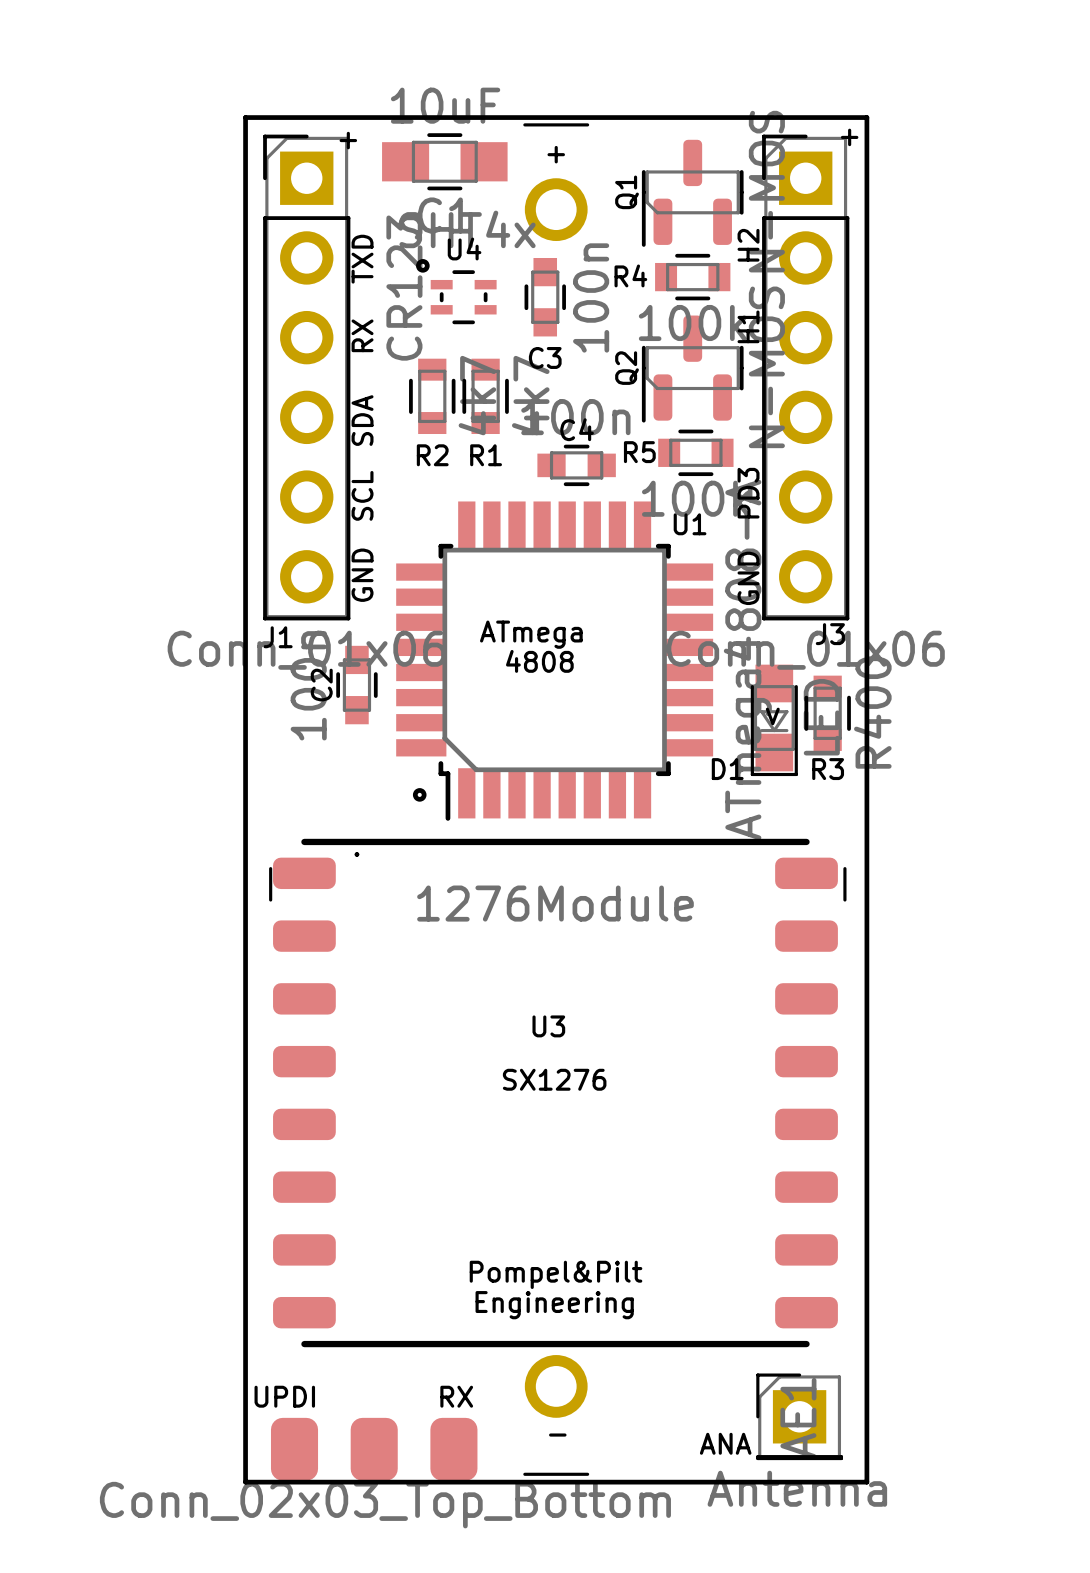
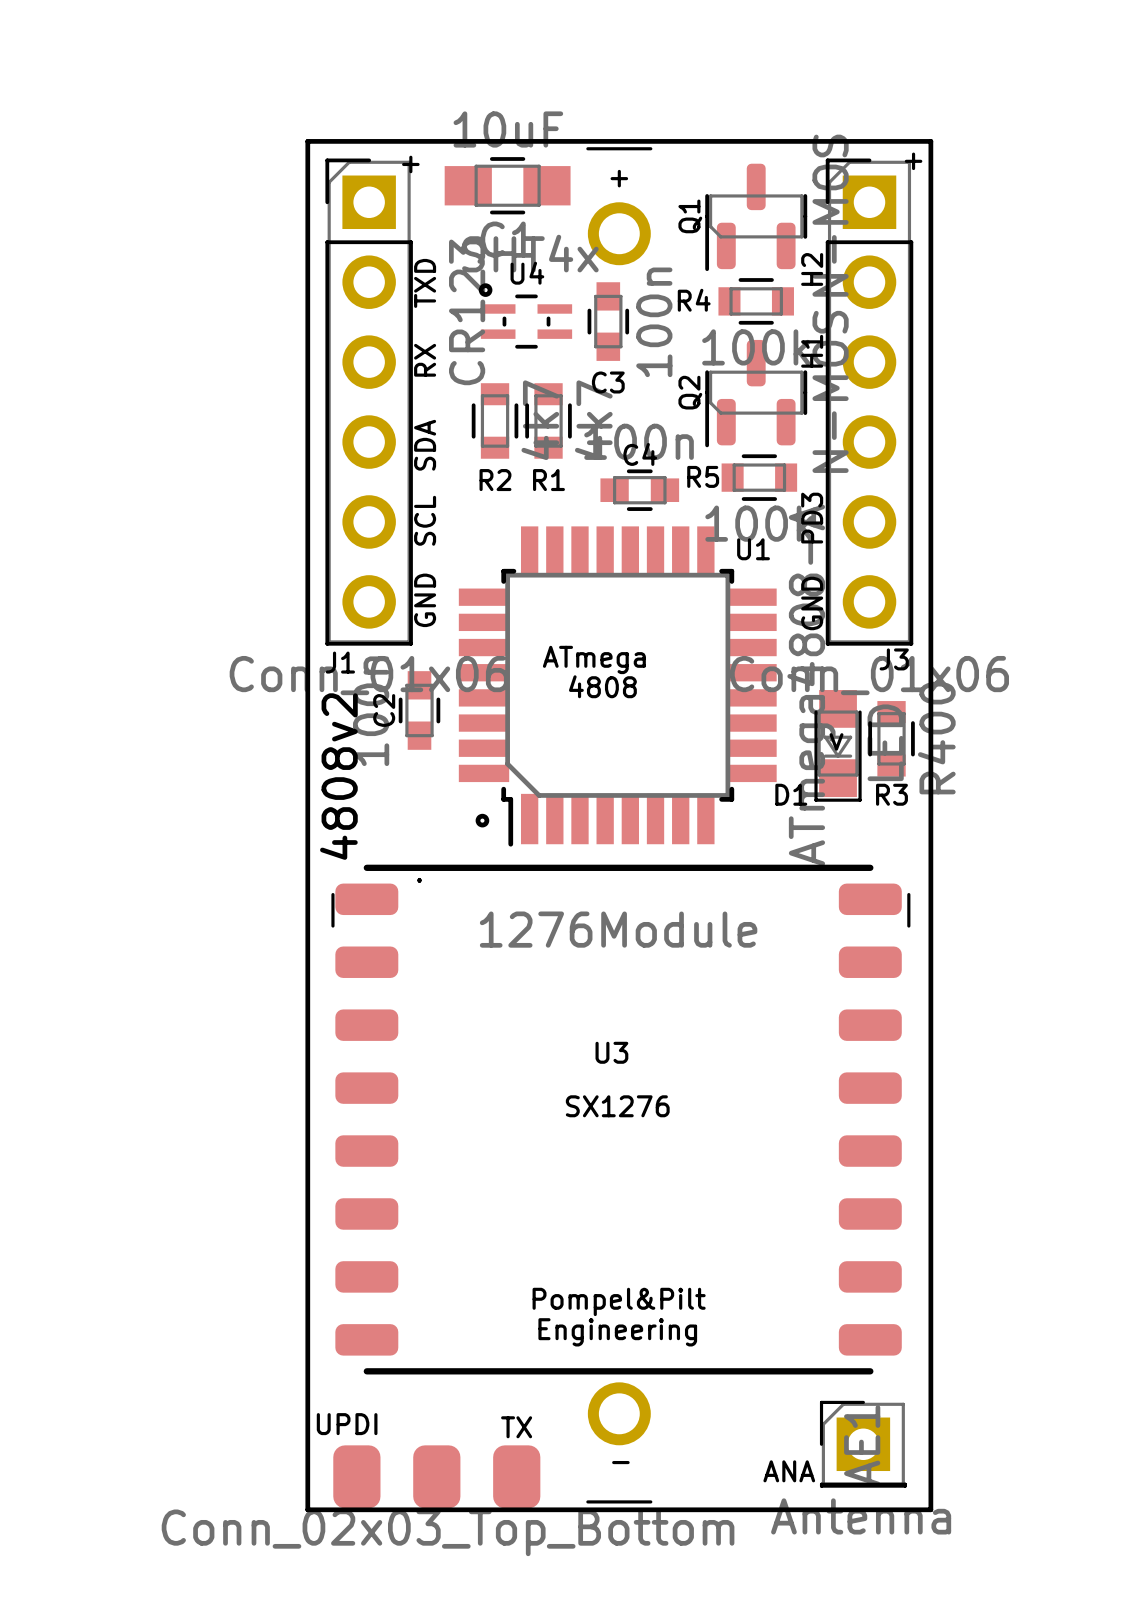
U4 footprint: [430, 270, 497, 325] -> [480, 294, 573, 349]
text: none -> 4808v2 (338, 776)
text: RX (456, 1396) -> TX (516, 1427)

